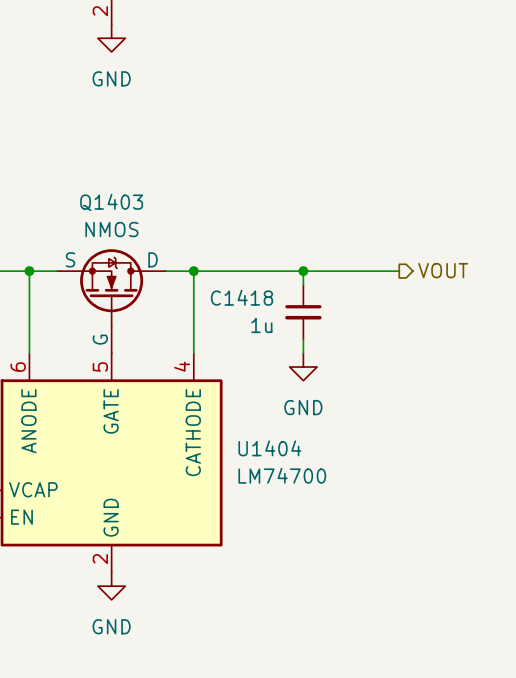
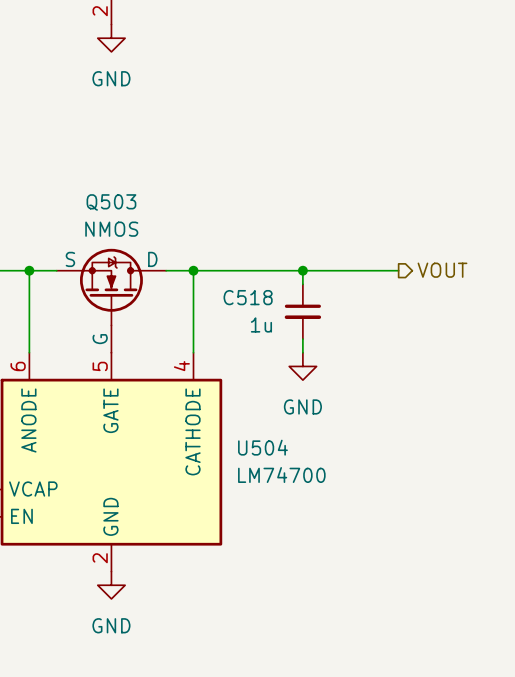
Q1403 name: Q1403 (111, 202) -> Q503 (111, 202)
C1418 name: C1418 (241, 297) -> C518 (248, 297)
U1404 name: U1404 (269, 448) -> U504 (262, 447)

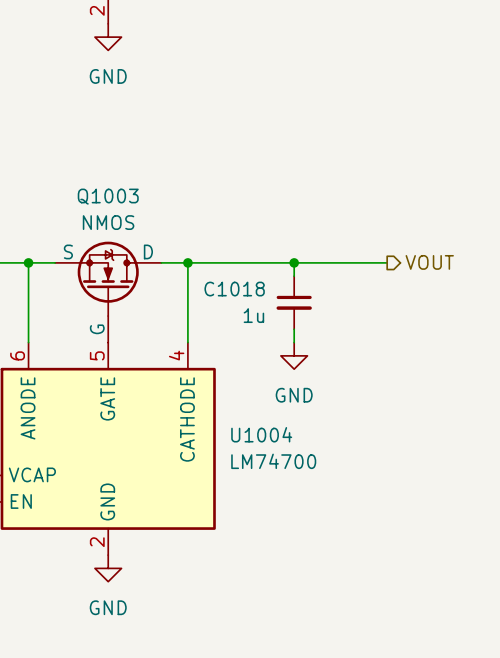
Q503 name: Q503 (111, 202) -> Q1003 (108, 196)
C518 name: C518 (248, 297) -> C1018 (234, 289)
U504 name: U504 (262, 447) -> U1004 (261, 434)

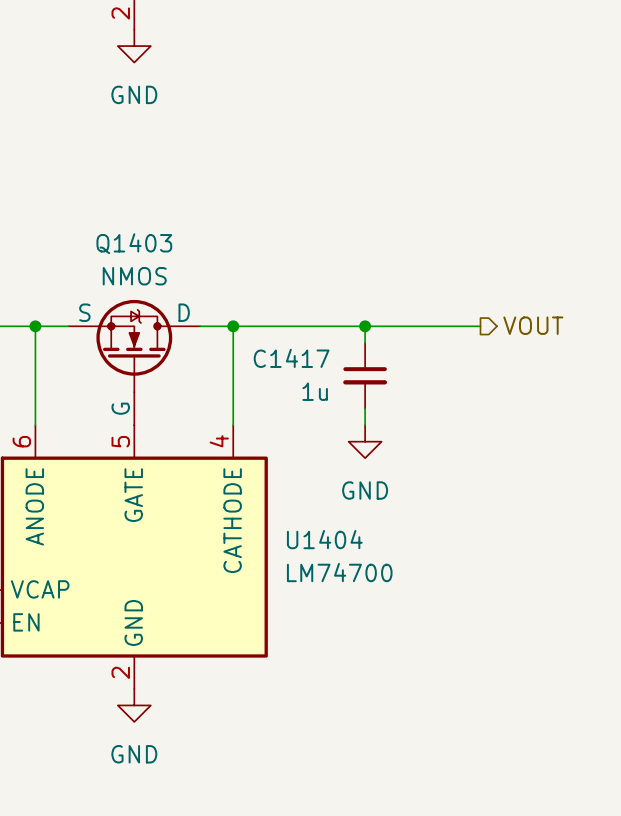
Q1003 name: Q1003 (108, 196) -> Q1403 (134, 243)
C1018 name: C1018 (234, 289) -> C1417 (291, 358)
U1004 name: U1004 (261, 434) -> U1404 (324, 539)

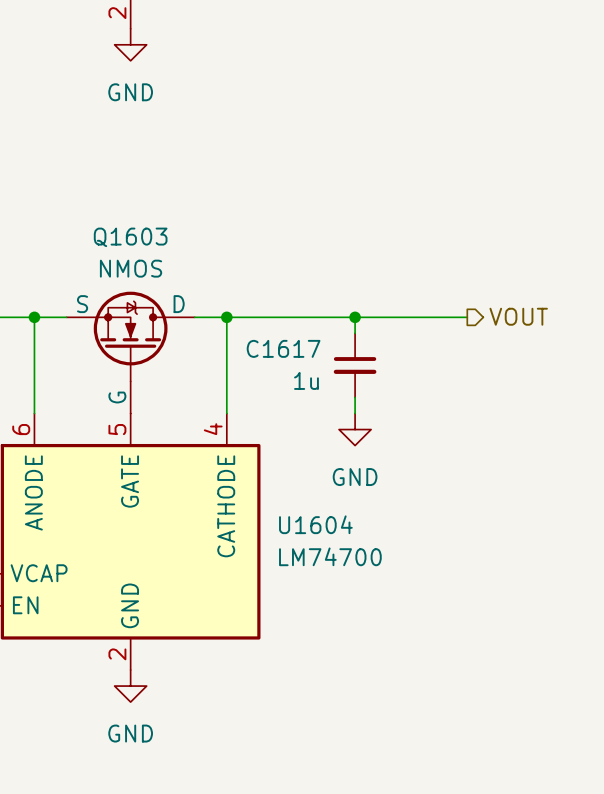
Q1403 name: Q1403 (134, 243) -> Q1603 (130, 237)
C1417 name: C1417 (291, 358) -> C1617 (283, 348)
U1404 name: U1404 (324, 539) -> U1604 (315, 524)

